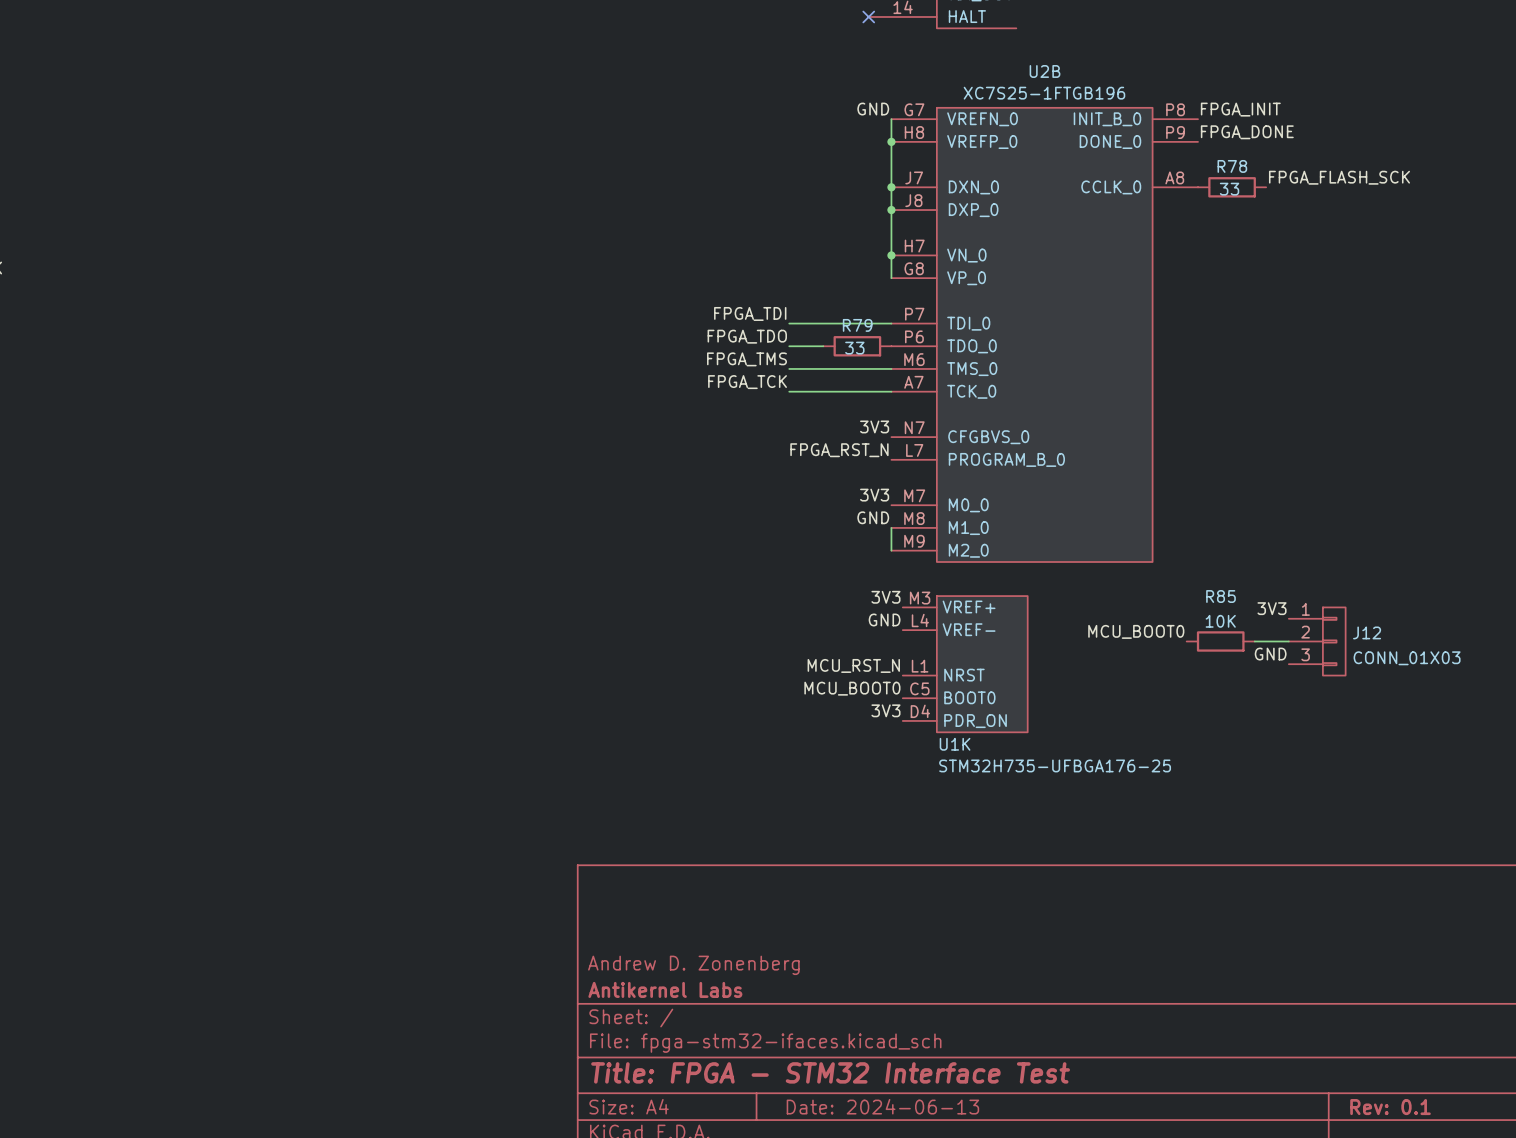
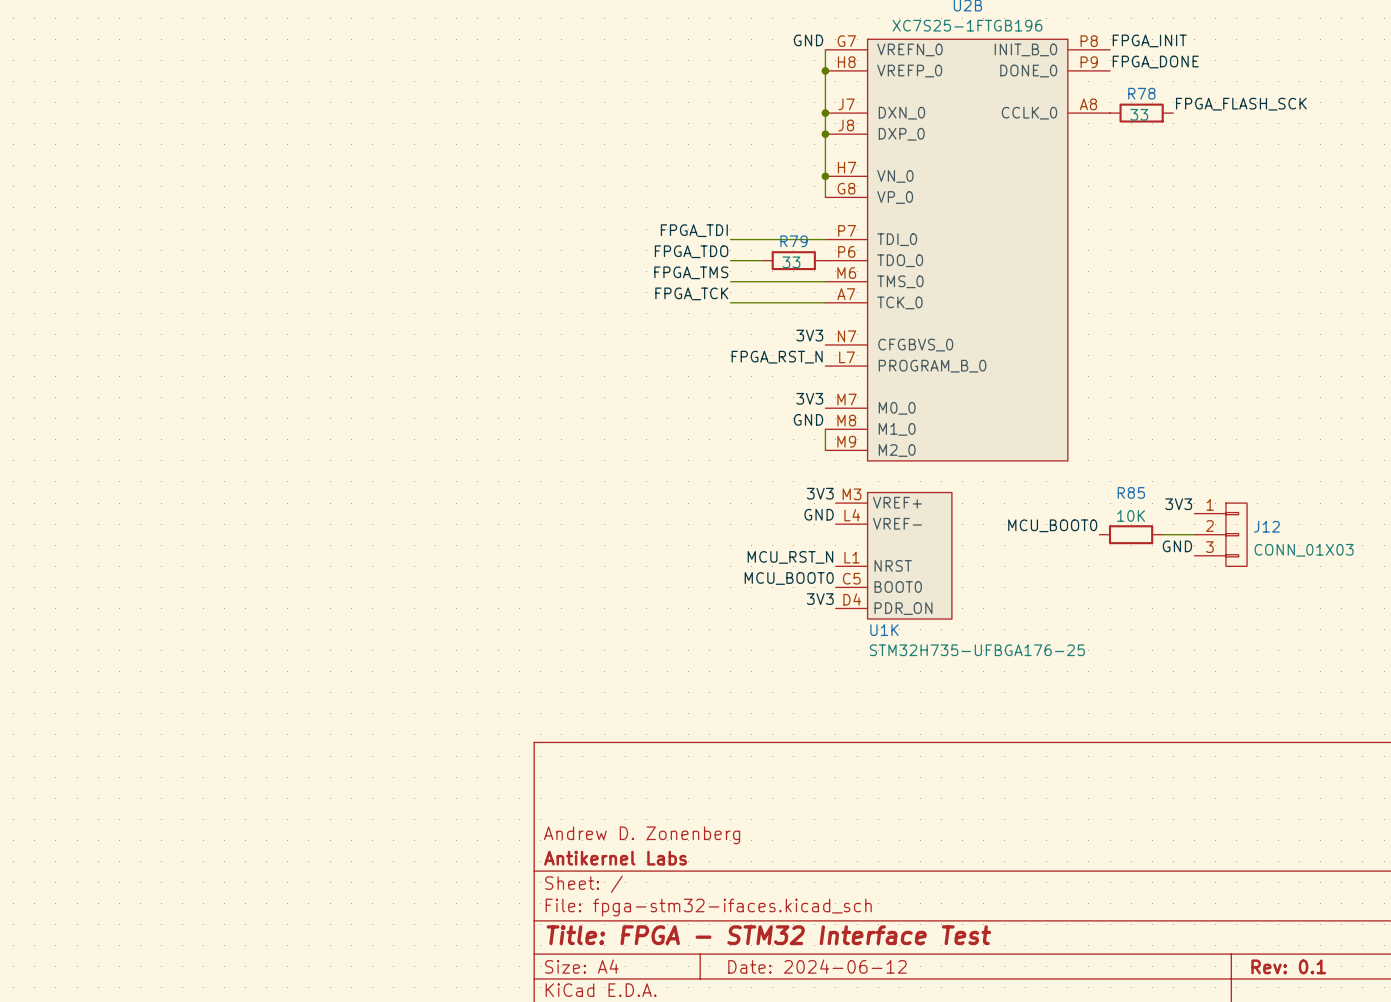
title block: Date: 2024-06-13 (882, 1106) -> Date: 2024-06-12 (817, 966)

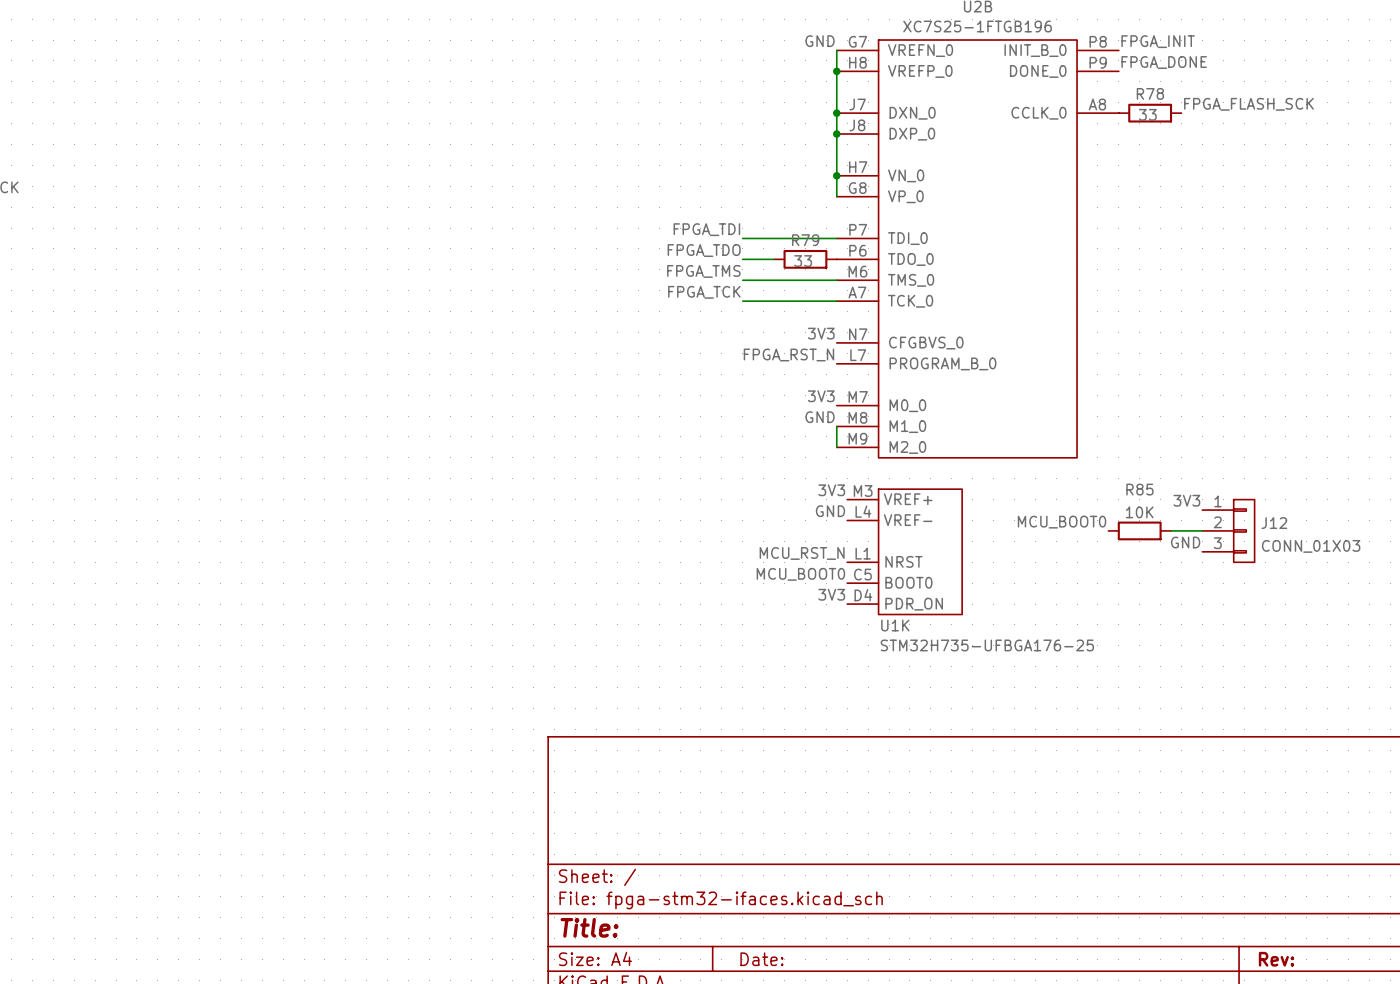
title block: Andrew D. Zonenberg (642, 835) -> none
title block: Antikernel Labs (615, 858) -> none
title block: Title: FPGA - STM32 Interface Test (768, 935) -> Title: (589, 927)
title block: Date: 2024-06-12 (817, 966) -> Date: (761, 959)
title block: Rev: 0.1 (1288, 966) -> Rev: (1276, 959)

